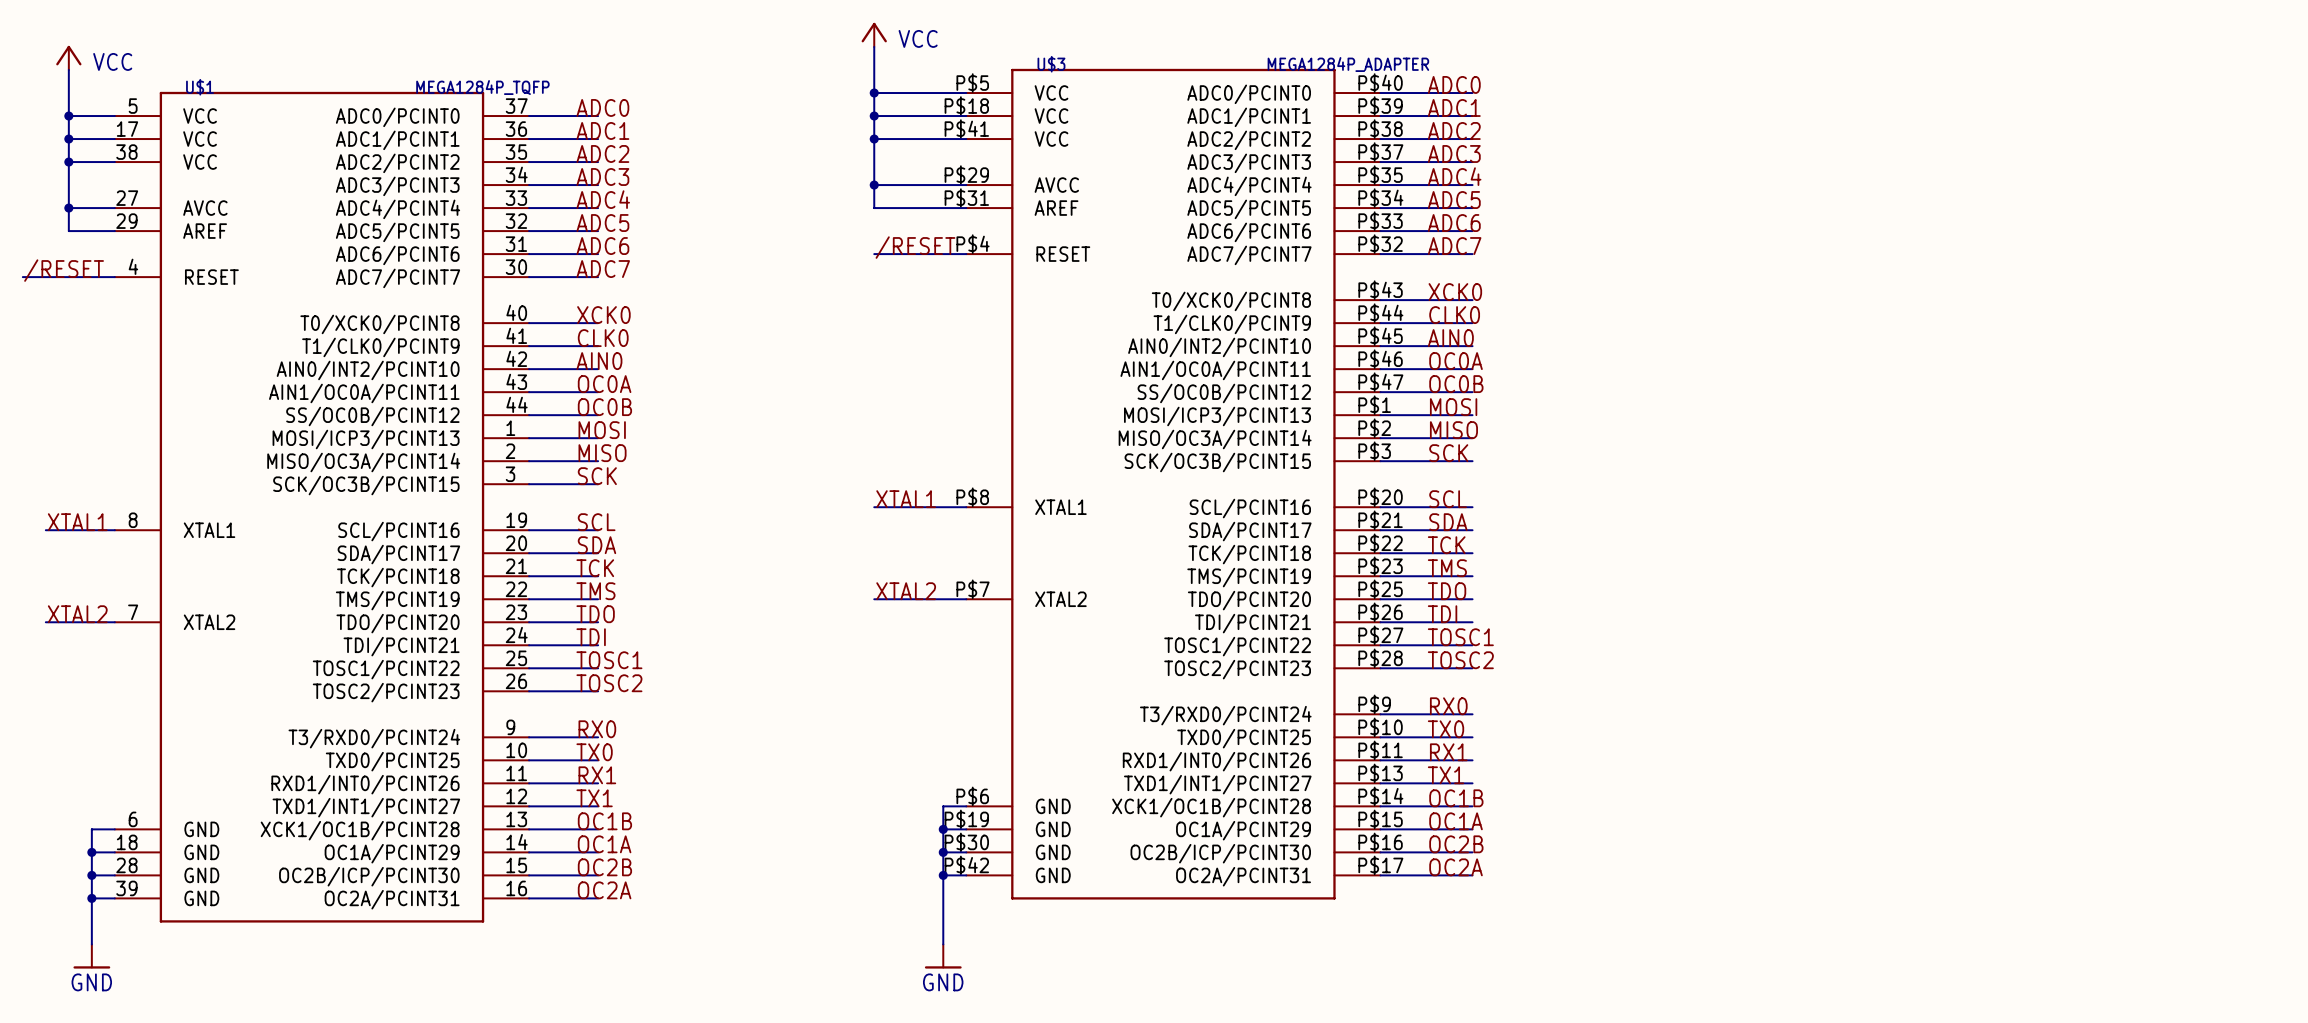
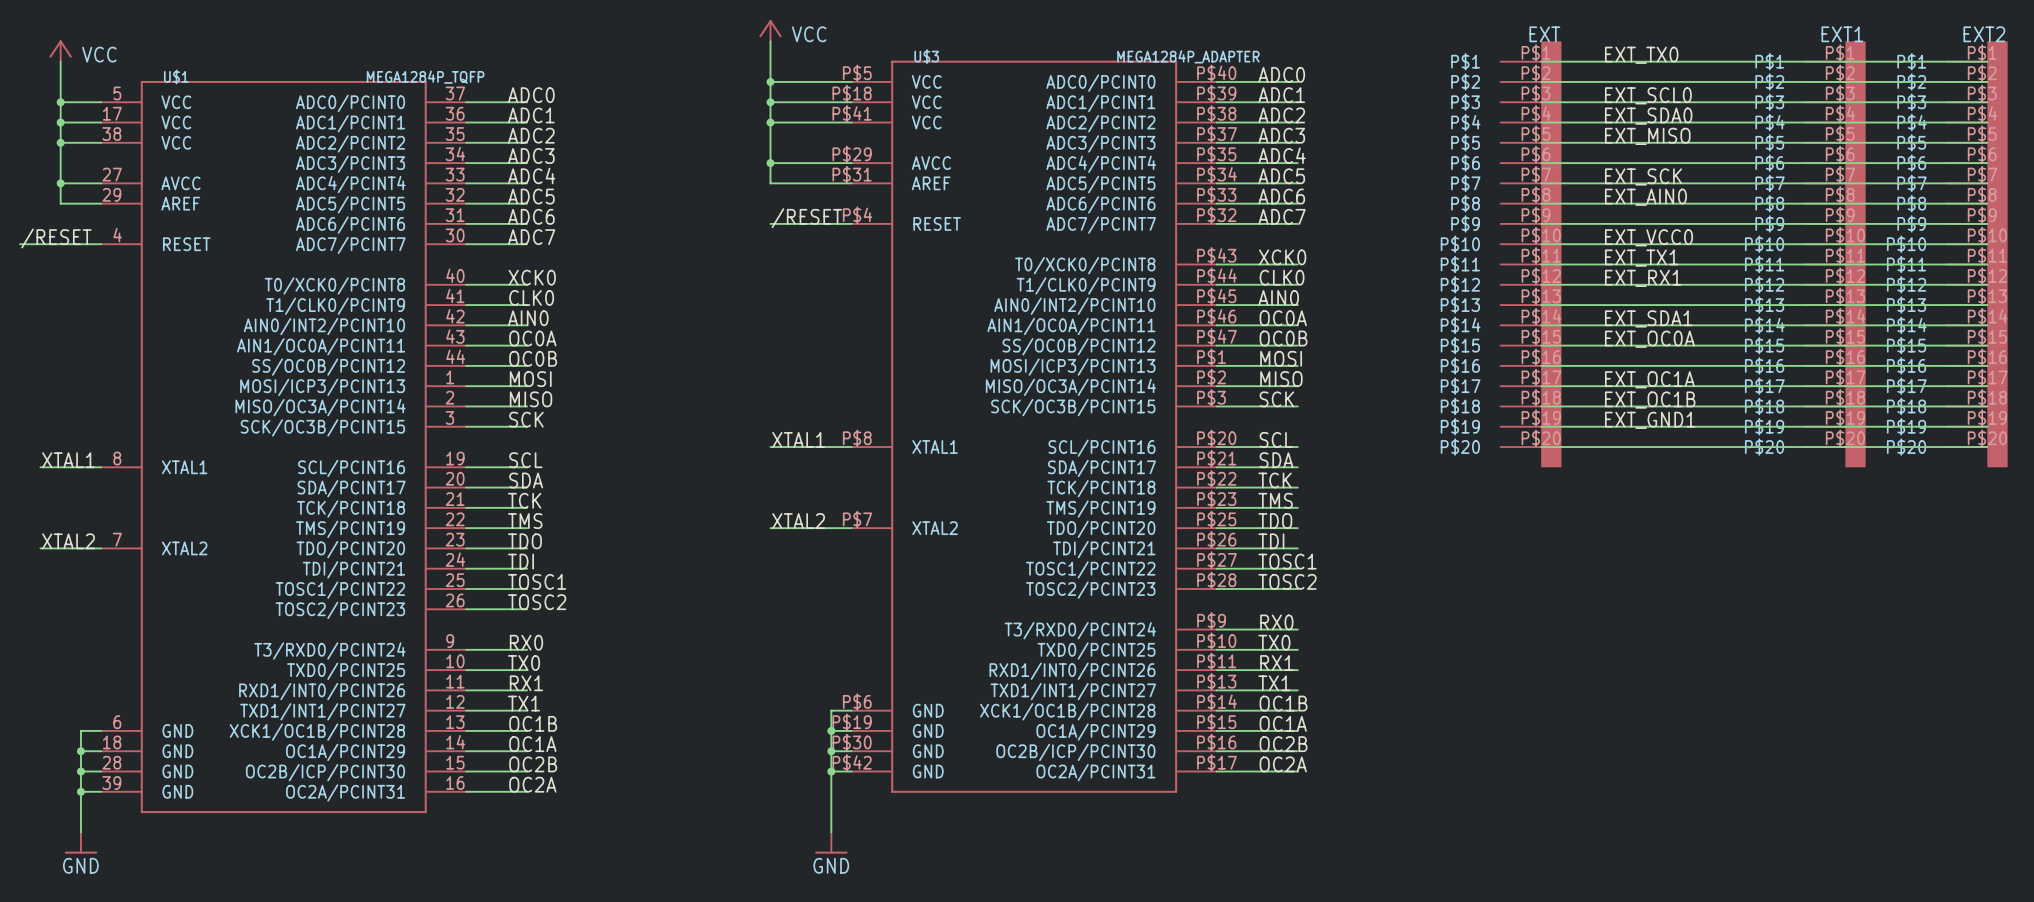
label: none -> EXT_TX0 (1641, 55)
wire: none -> (1541, 61) (1987, 61)
wire: none -> (1541, 81) (1987, 81)
label: none -> EXT_SCL0 (1648, 95)
wire: none -> (1541, 102) (1987, 102)
label: none -> EXT_SDA0 (1648, 116)
wire: none -> (1541, 122) (1987, 122)
label: none -> EXT_MISO (1647, 136)
wire: none -> (1541, 142) (1987, 142)
wire: none -> (1541, 163) (1987, 163)
label: none -> EXT_SCK (1643, 176)
wire: none -> (1541, 183) (1987, 183)
label: none -> EXT_AIN0 (1645, 197)
wire: none -> (1541, 203) (1987, 203)
wire: none -> (1541, 223) (1987, 223)
label: none -> EXT_VCC0 (1648, 237)
wire: none -> (1541, 244) (1987, 244)
EXT: none -> (1531, 254)
EXT1: none -> (1835, 254)
EXT2: none -> (1977, 254)
label: none -> EXT_TX1 (1641, 258)
wire: none -> (1541, 264) (1987, 264)
label: none -> EXT_RX1 (1643, 278)
wire: none -> (1541, 284) (1987, 284)
wire: none -> (1541, 305) (1987, 305)
label: none -> EXT_SDA1 (1648, 318)
wire: none -> (1541, 325) (1987, 325)
label: none -> EXT_OC0A (1649, 339)
wire: none -> (1541, 345) (1987, 345)
wire: none -> (1541, 365) (1987, 365)
label: none -> EXT_OC1A (1649, 379)
wire: none -> (1541, 386) (1987, 386)
label: none -> EXT_OC1B (1650, 400)
wire: none -> (1541, 406) (1987, 406)
label: none -> EXT_GND1 (1650, 420)
wire: none -> (1541, 426) (1987, 426)
wire: none -> (1541, 447) (1987, 447)

